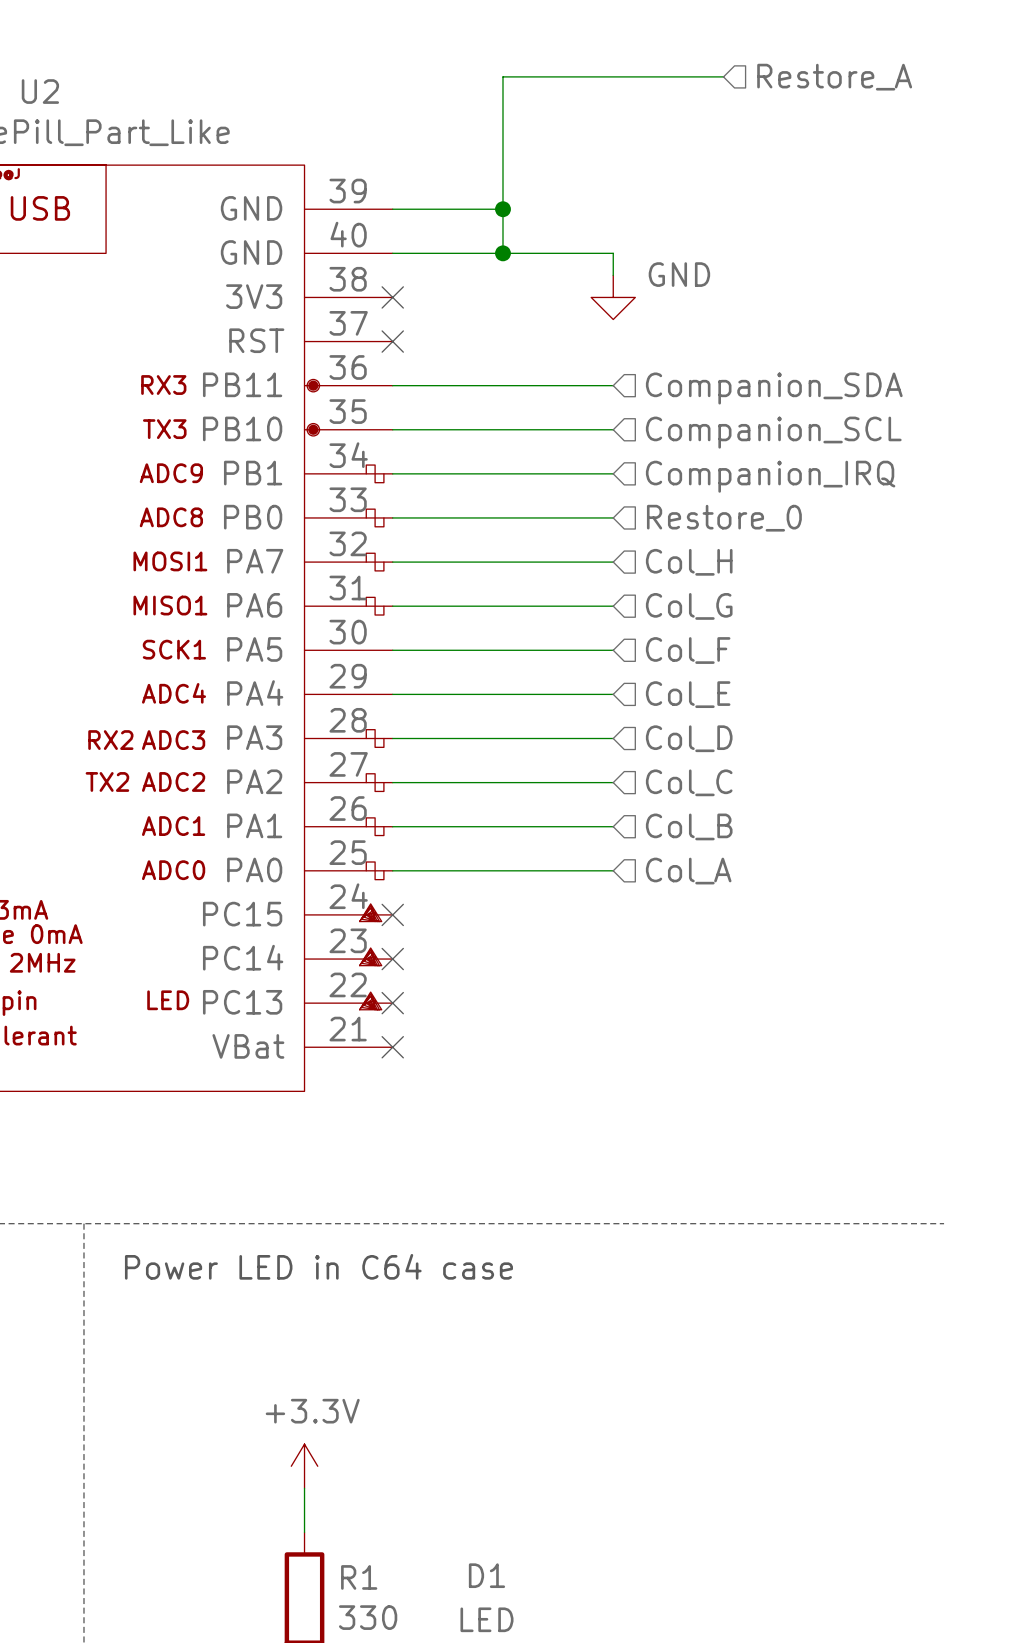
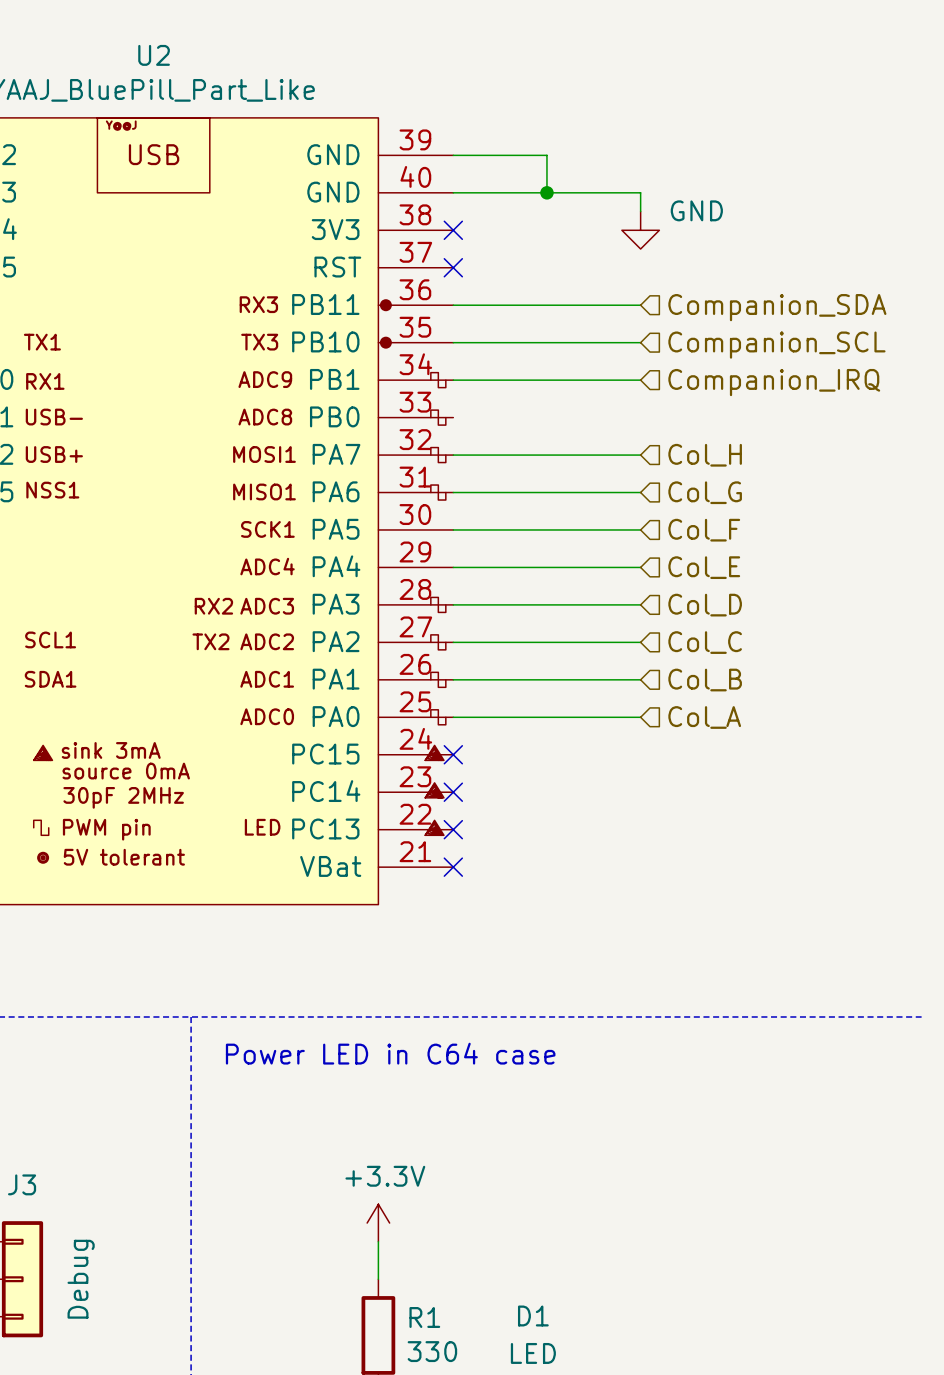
wire: (723, 76) (502, 76) (502, 209) -> none
hierarchical label: Restore_A (834, 77) -> none
junction: (502, 209) -> none
wire: (392, 517) (613, 517) -> none
hierarchical label: Restore_0 (724, 518) -> none

